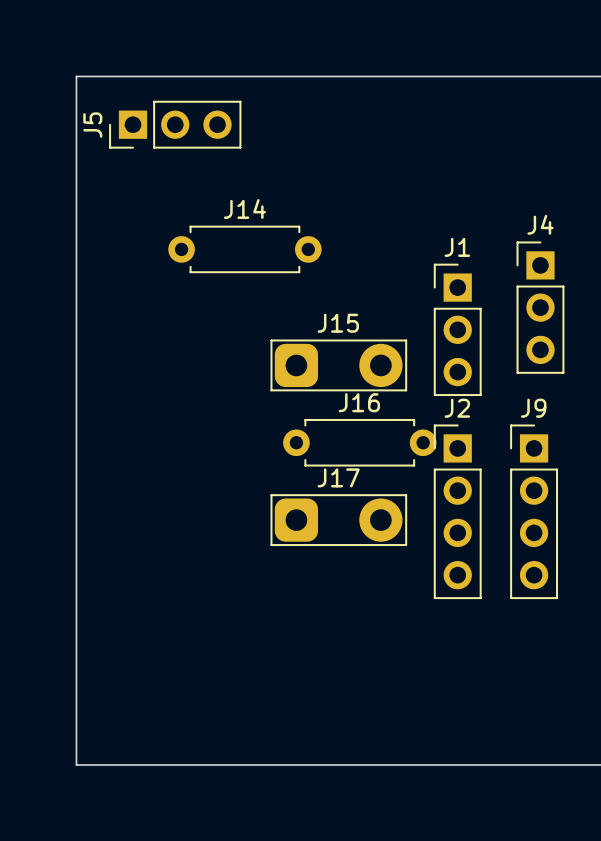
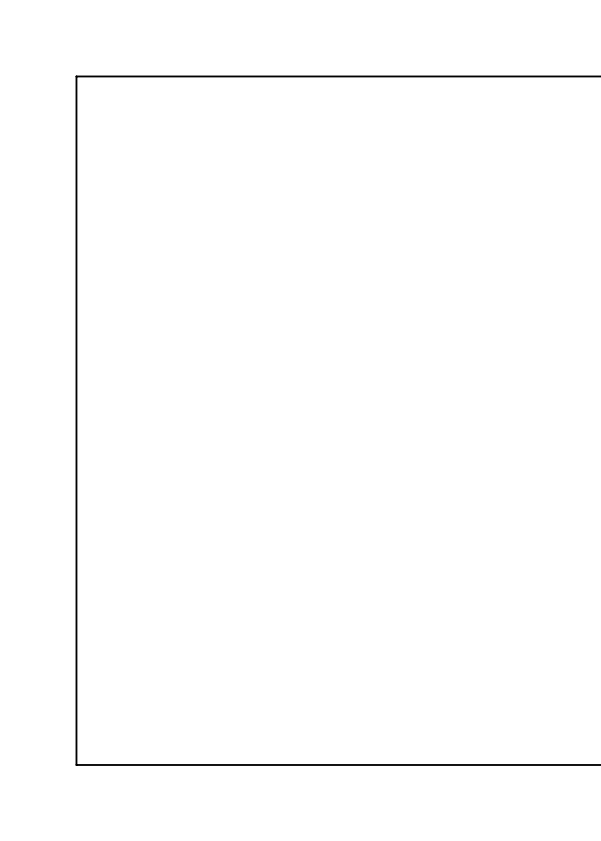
J5: (175, 124) -> none
J14: (244, 249) -> none
J4: (540, 307) -> none
J1: (457, 329) -> none
J15: (338, 365) -> none
J16: (359, 442) -> none
J2: (457, 511) -> none
J9: (534, 511) -> none
J17: (338, 520) -> none

